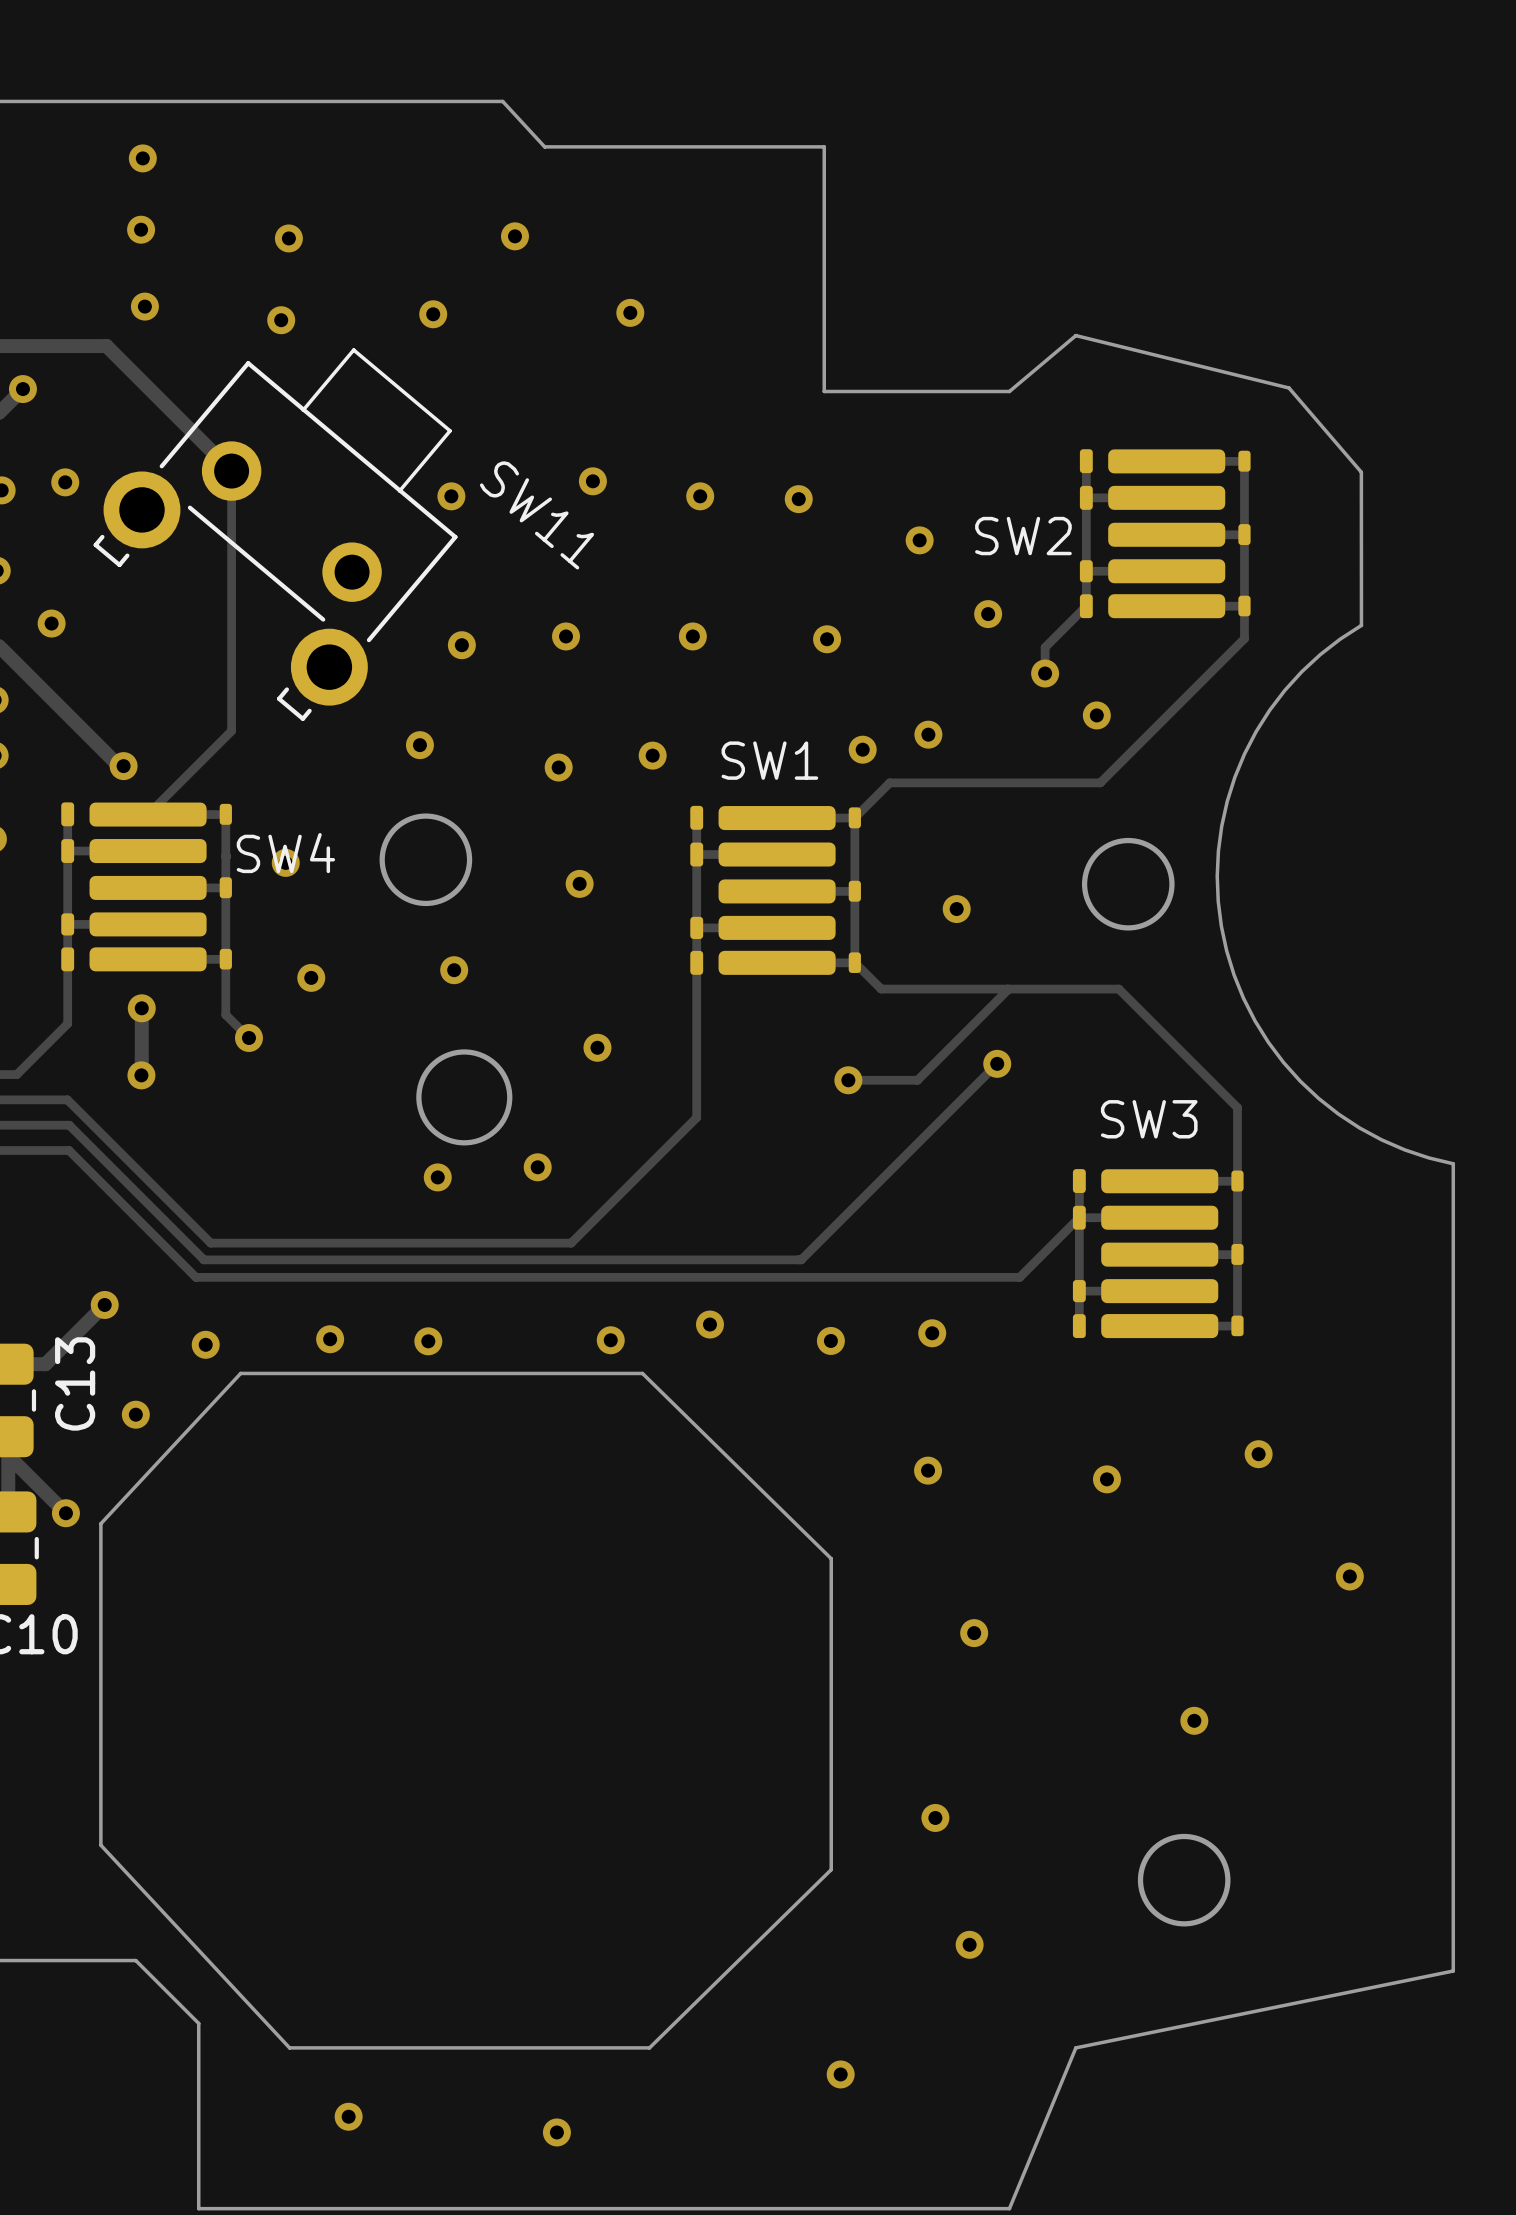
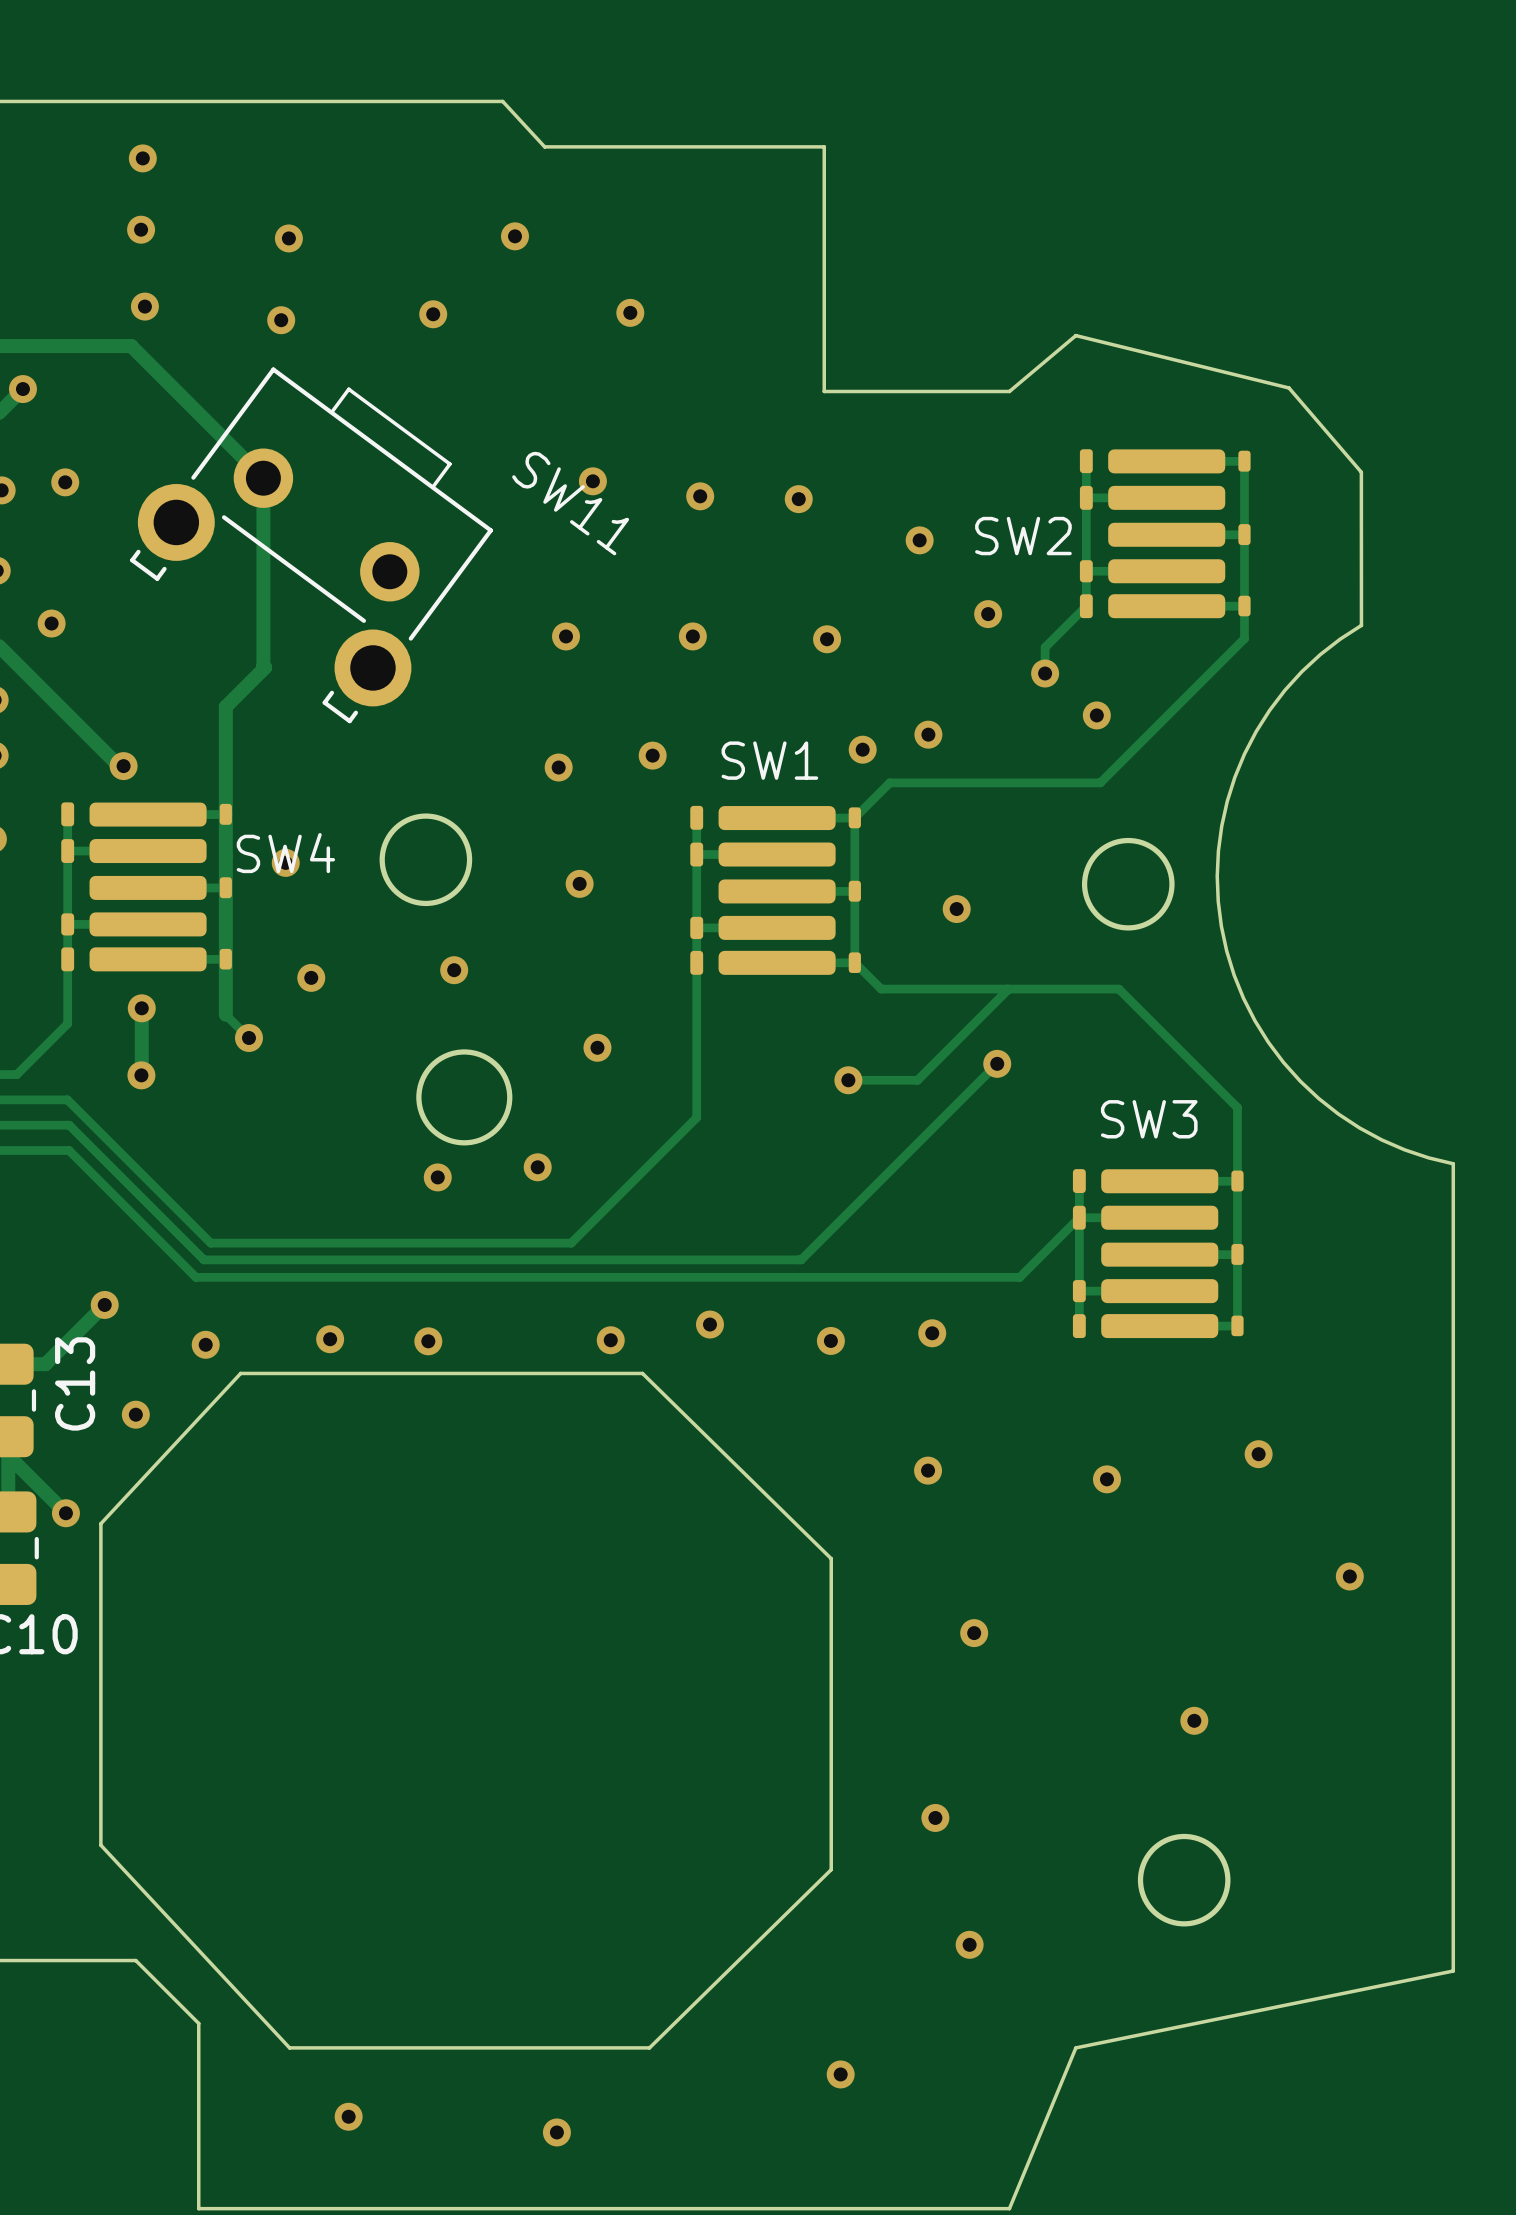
track: (106, 346) (231, 471) (231, 731) (148, 814) -> (106, 346) (131, 346) (263, 478) (263, 665) (265, 667) (225, 706) (225, 814)
SW11 footprint: [93, 348, 458, 721] -> [130, 367, 493, 724]
via: (451, 496) -> none
via: (461, 645) -> none
via: (419, 745) -> none
track width: thin (225, 814) (225, 855) -> thick (225, 814) (225, 855)
track width: thin (225, 857) (225, 1014) -> thick (225, 857) (225, 1014)

